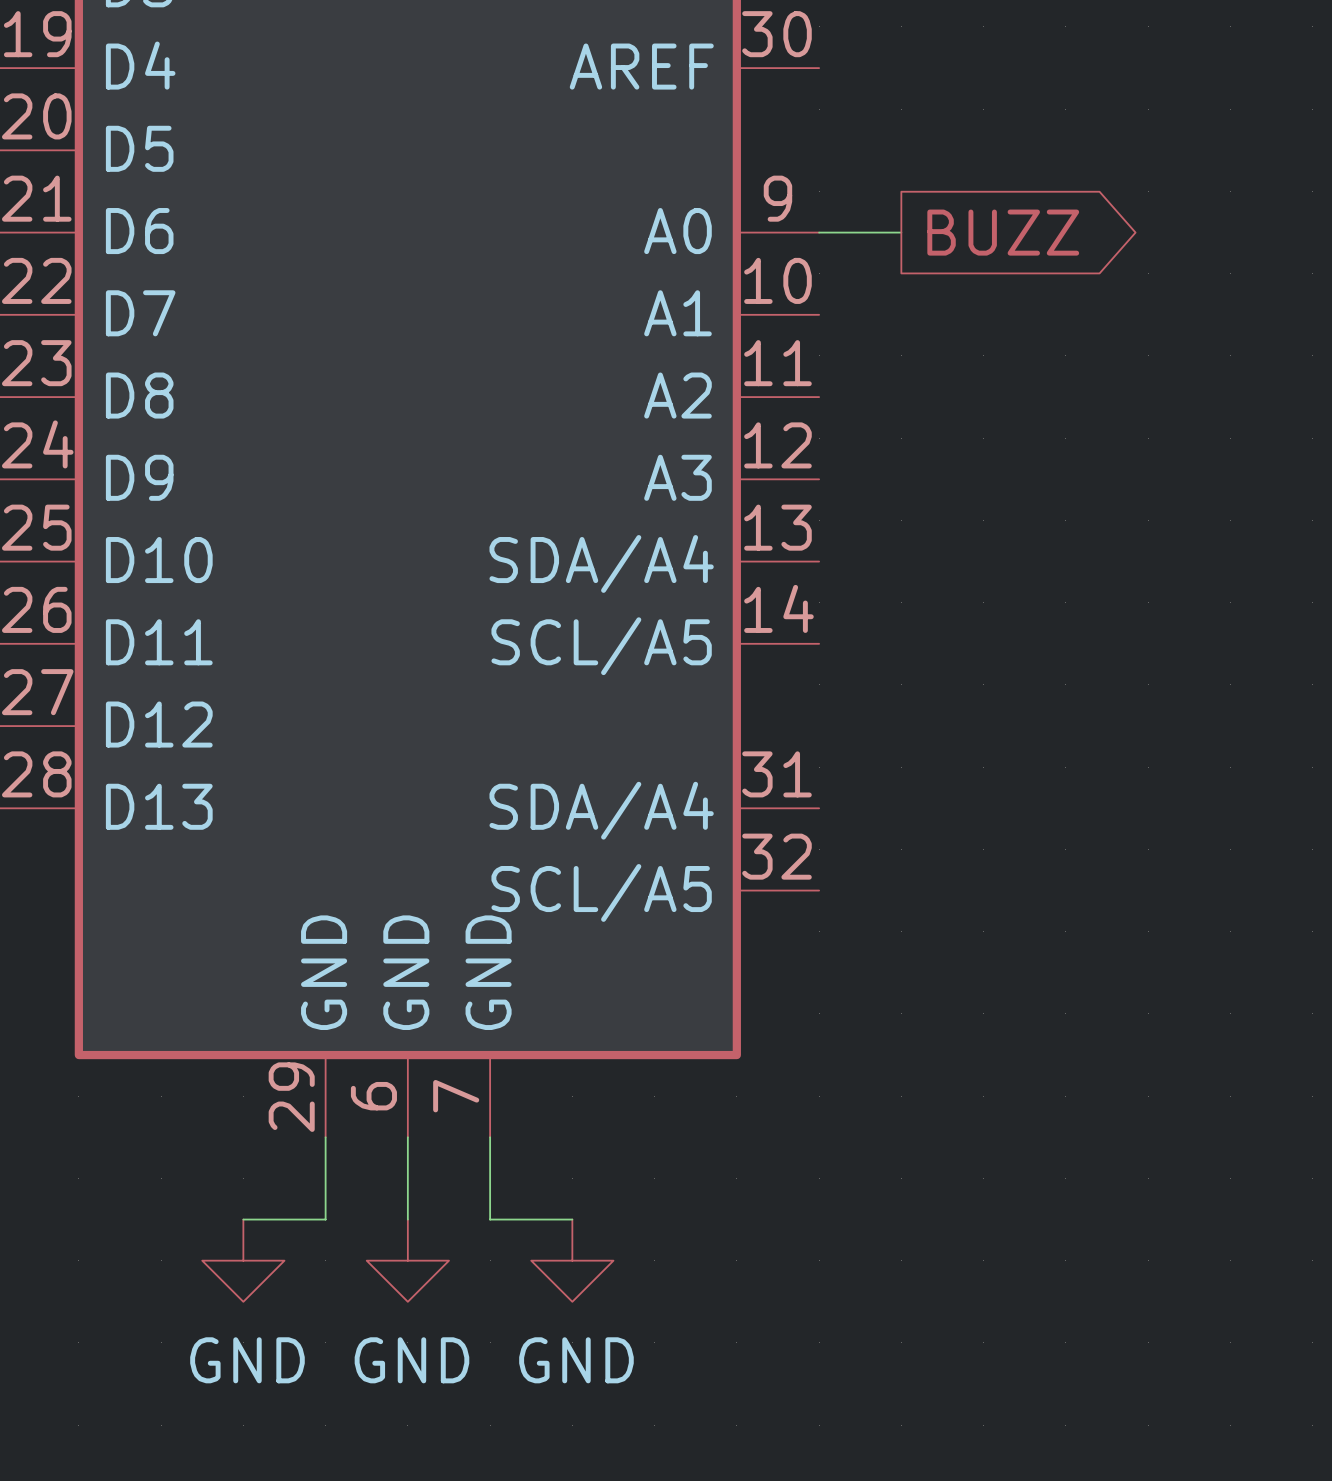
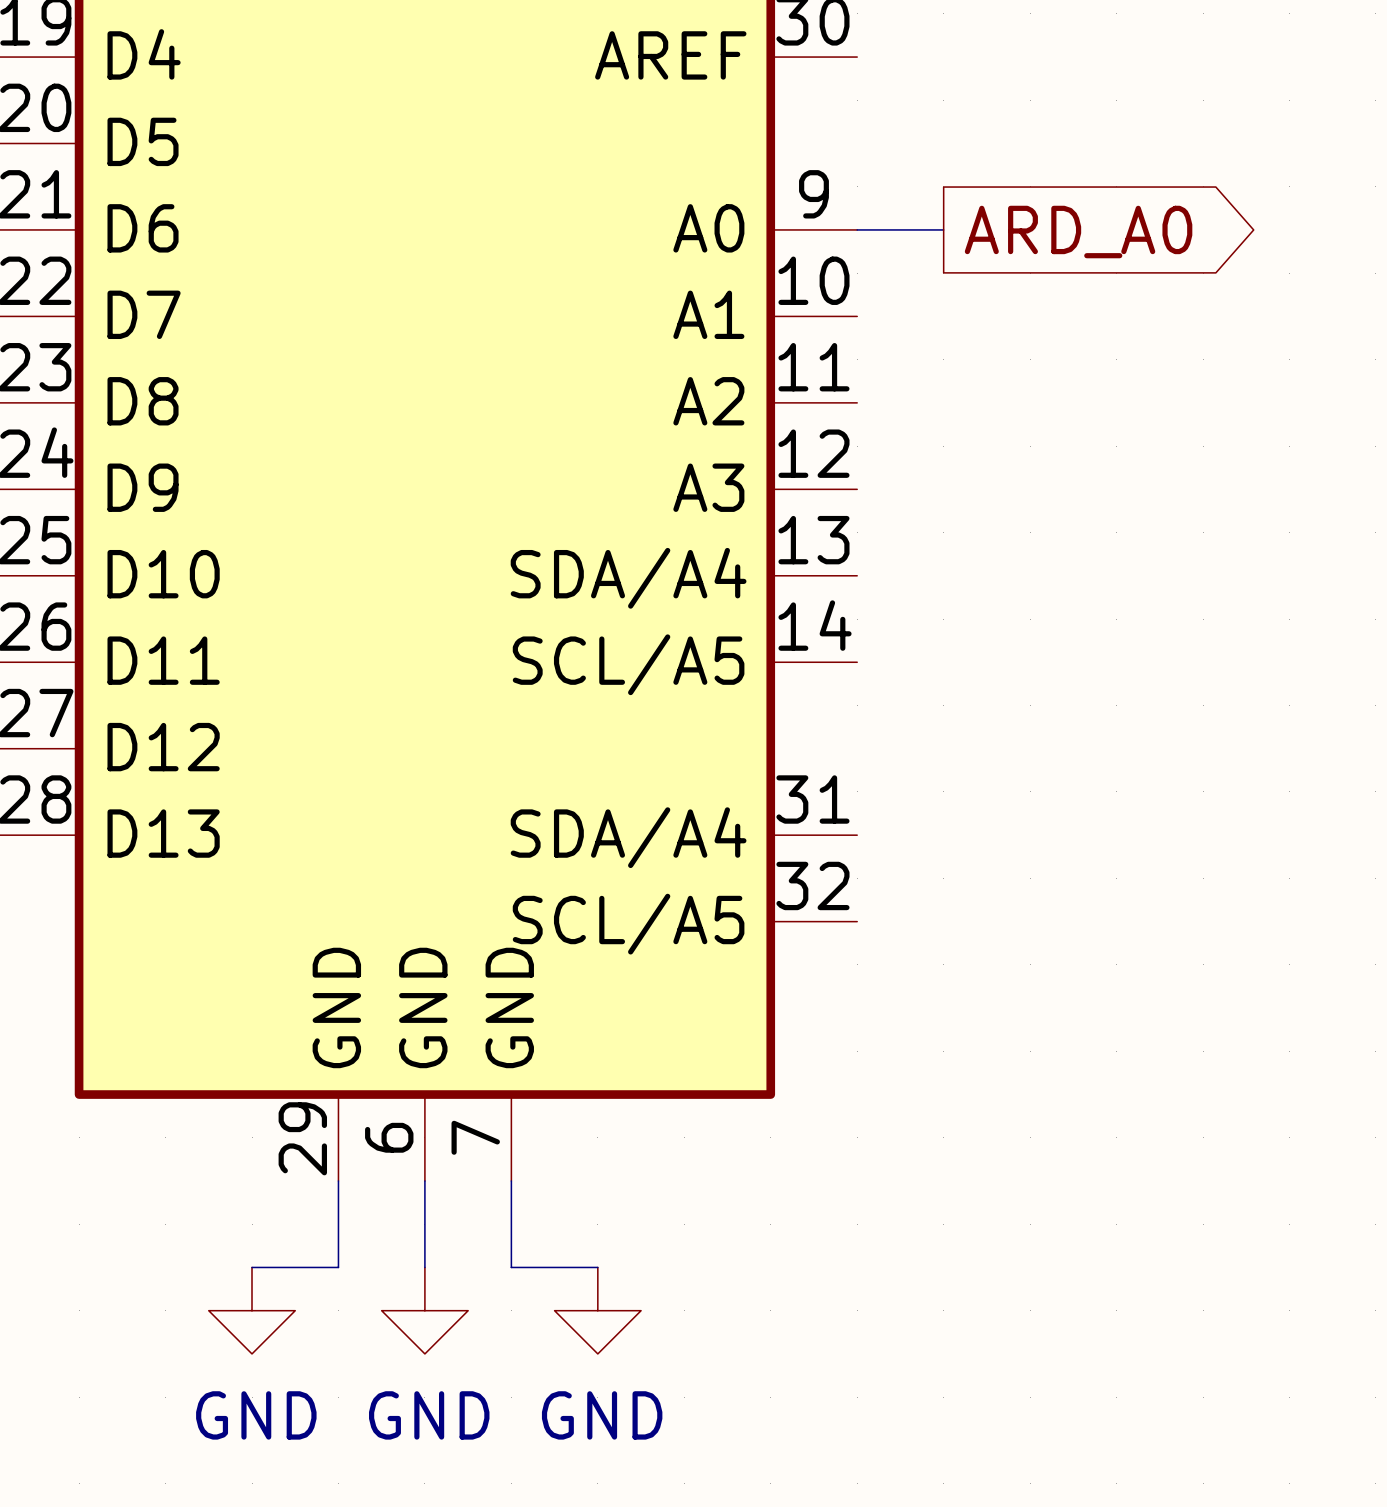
global label: BUZZ (1003, 232) -> ARD_A0 (1078, 232)

